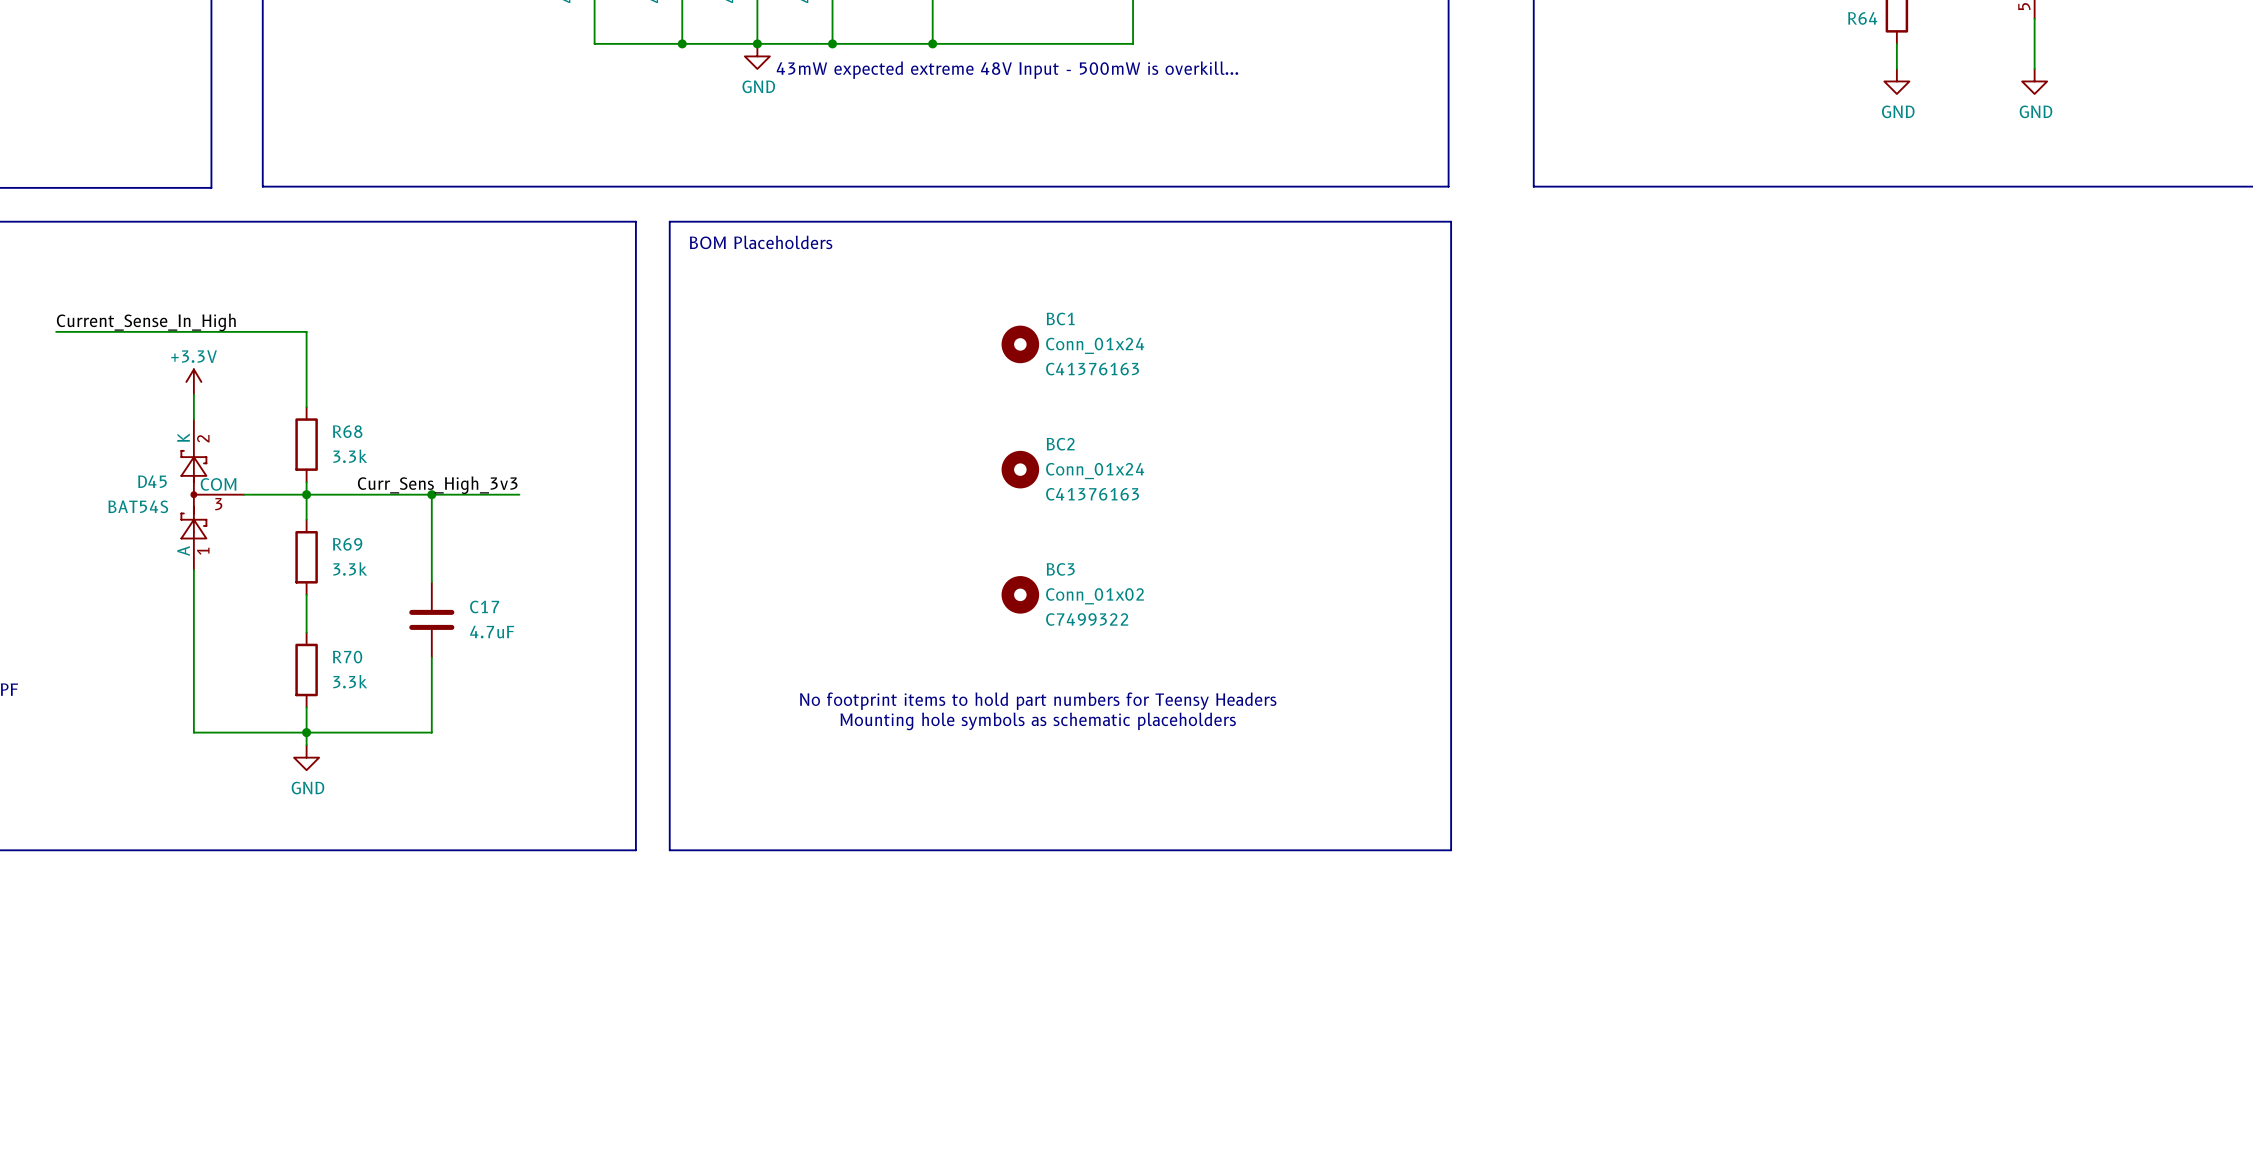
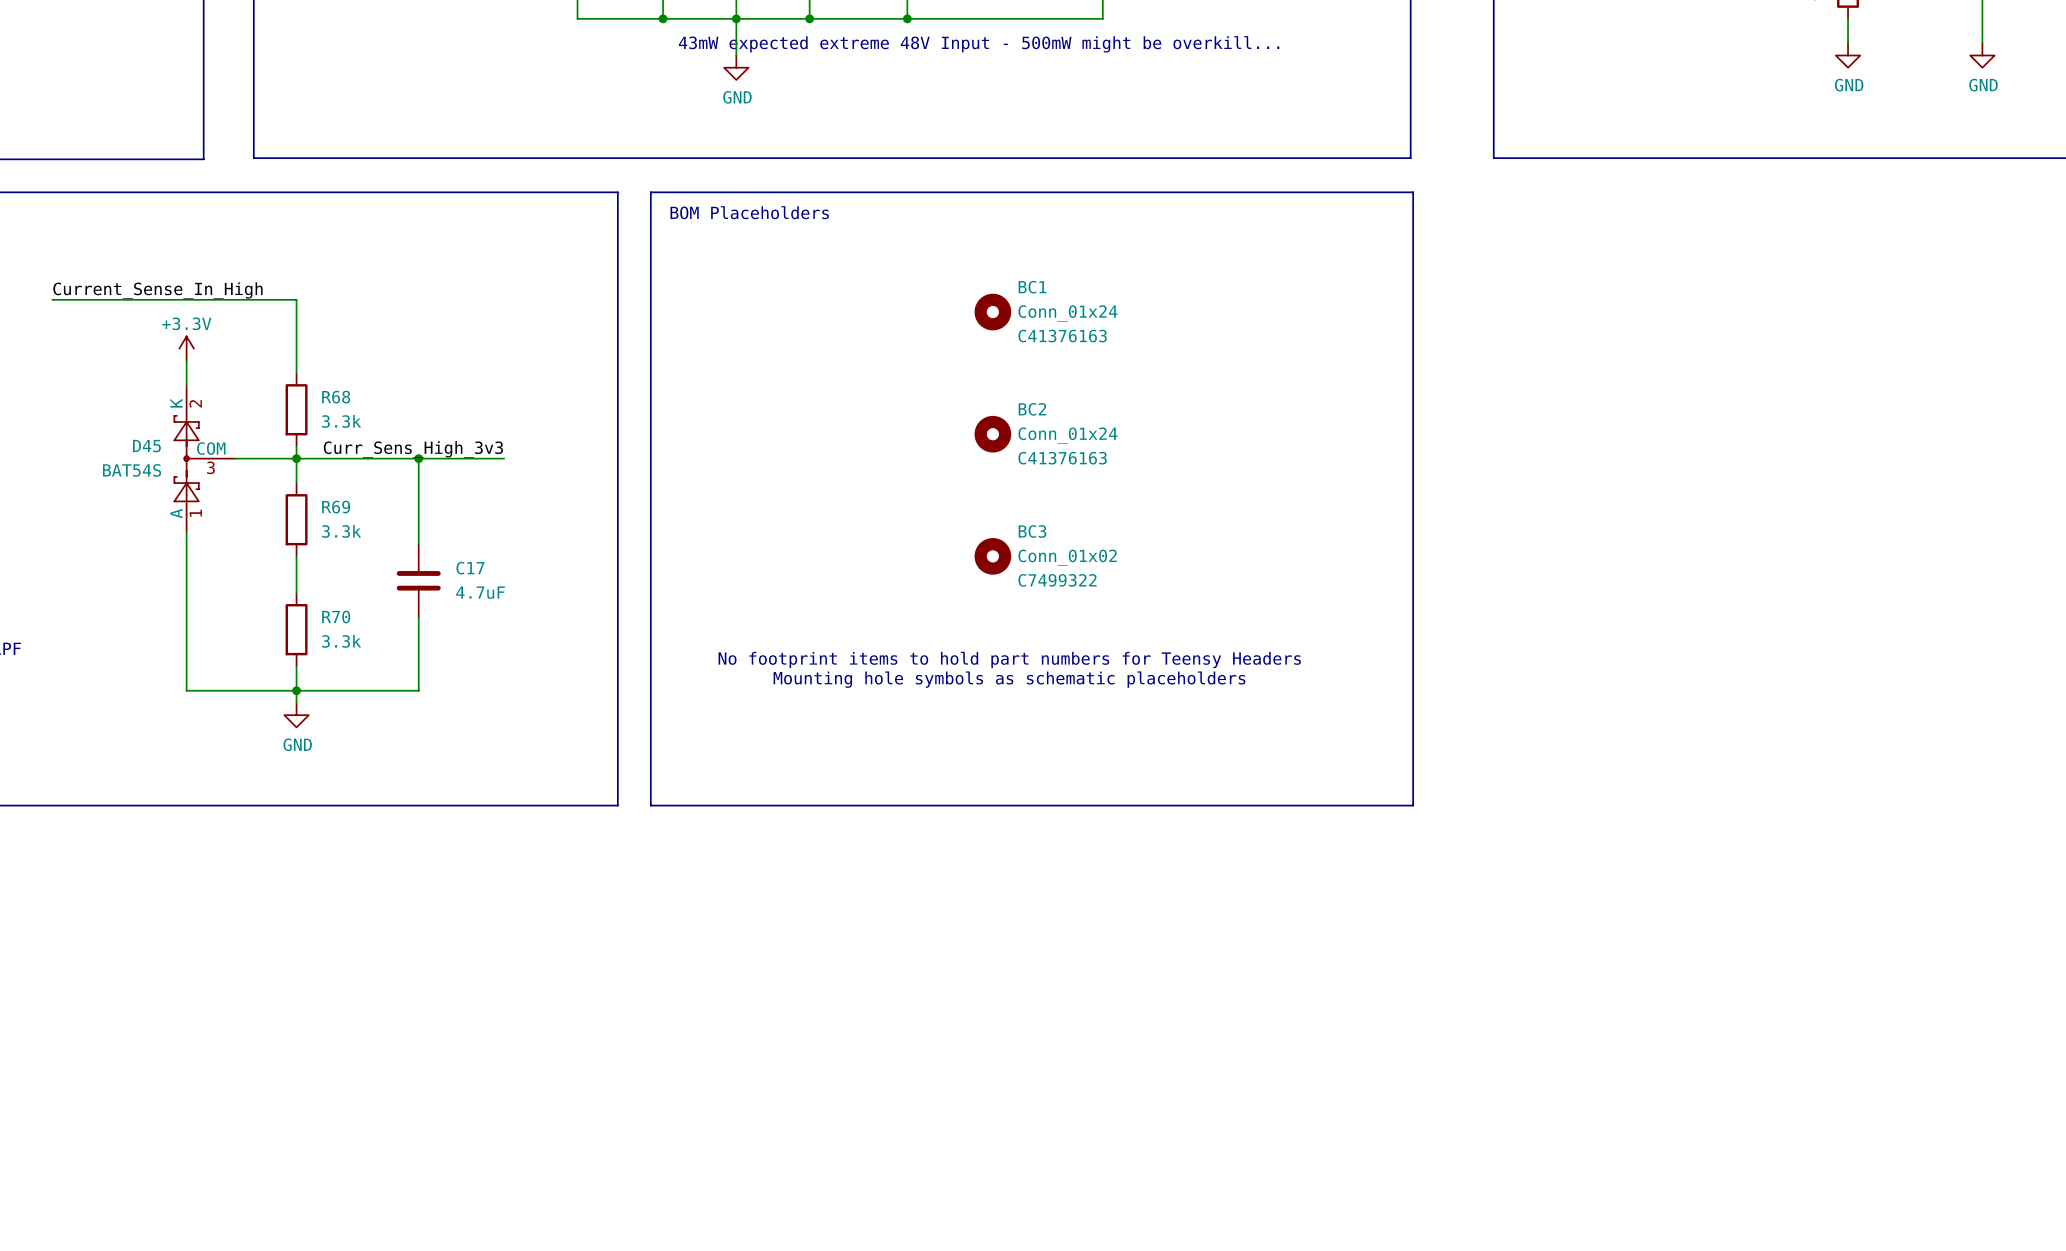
power symbol position: GND (757, 56) -> GND (736, 67)
text: 43mW expected extreme 48V Input - 500mW is overkill... (1007, 70) -> 43mW expected extreme 48V Input - 500mW might be overkill... (979, 44)

